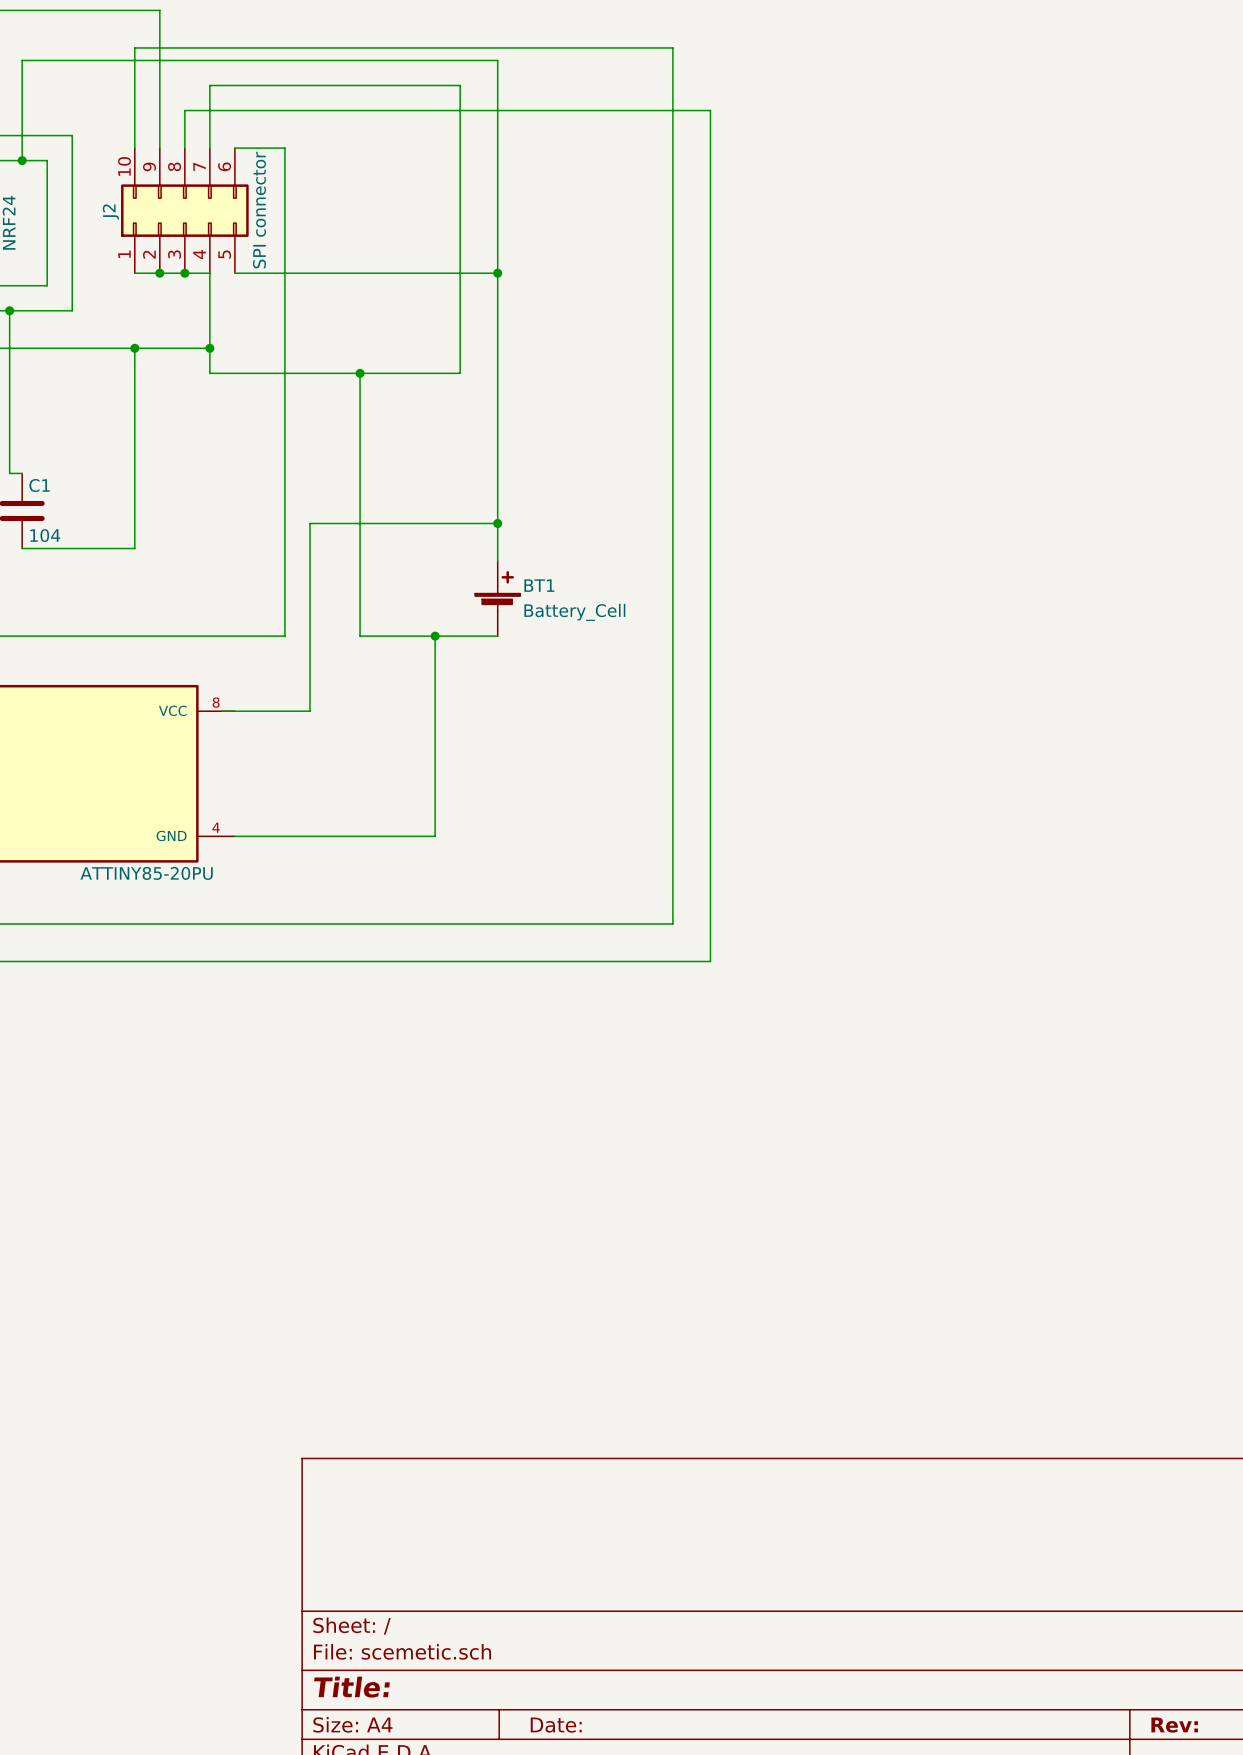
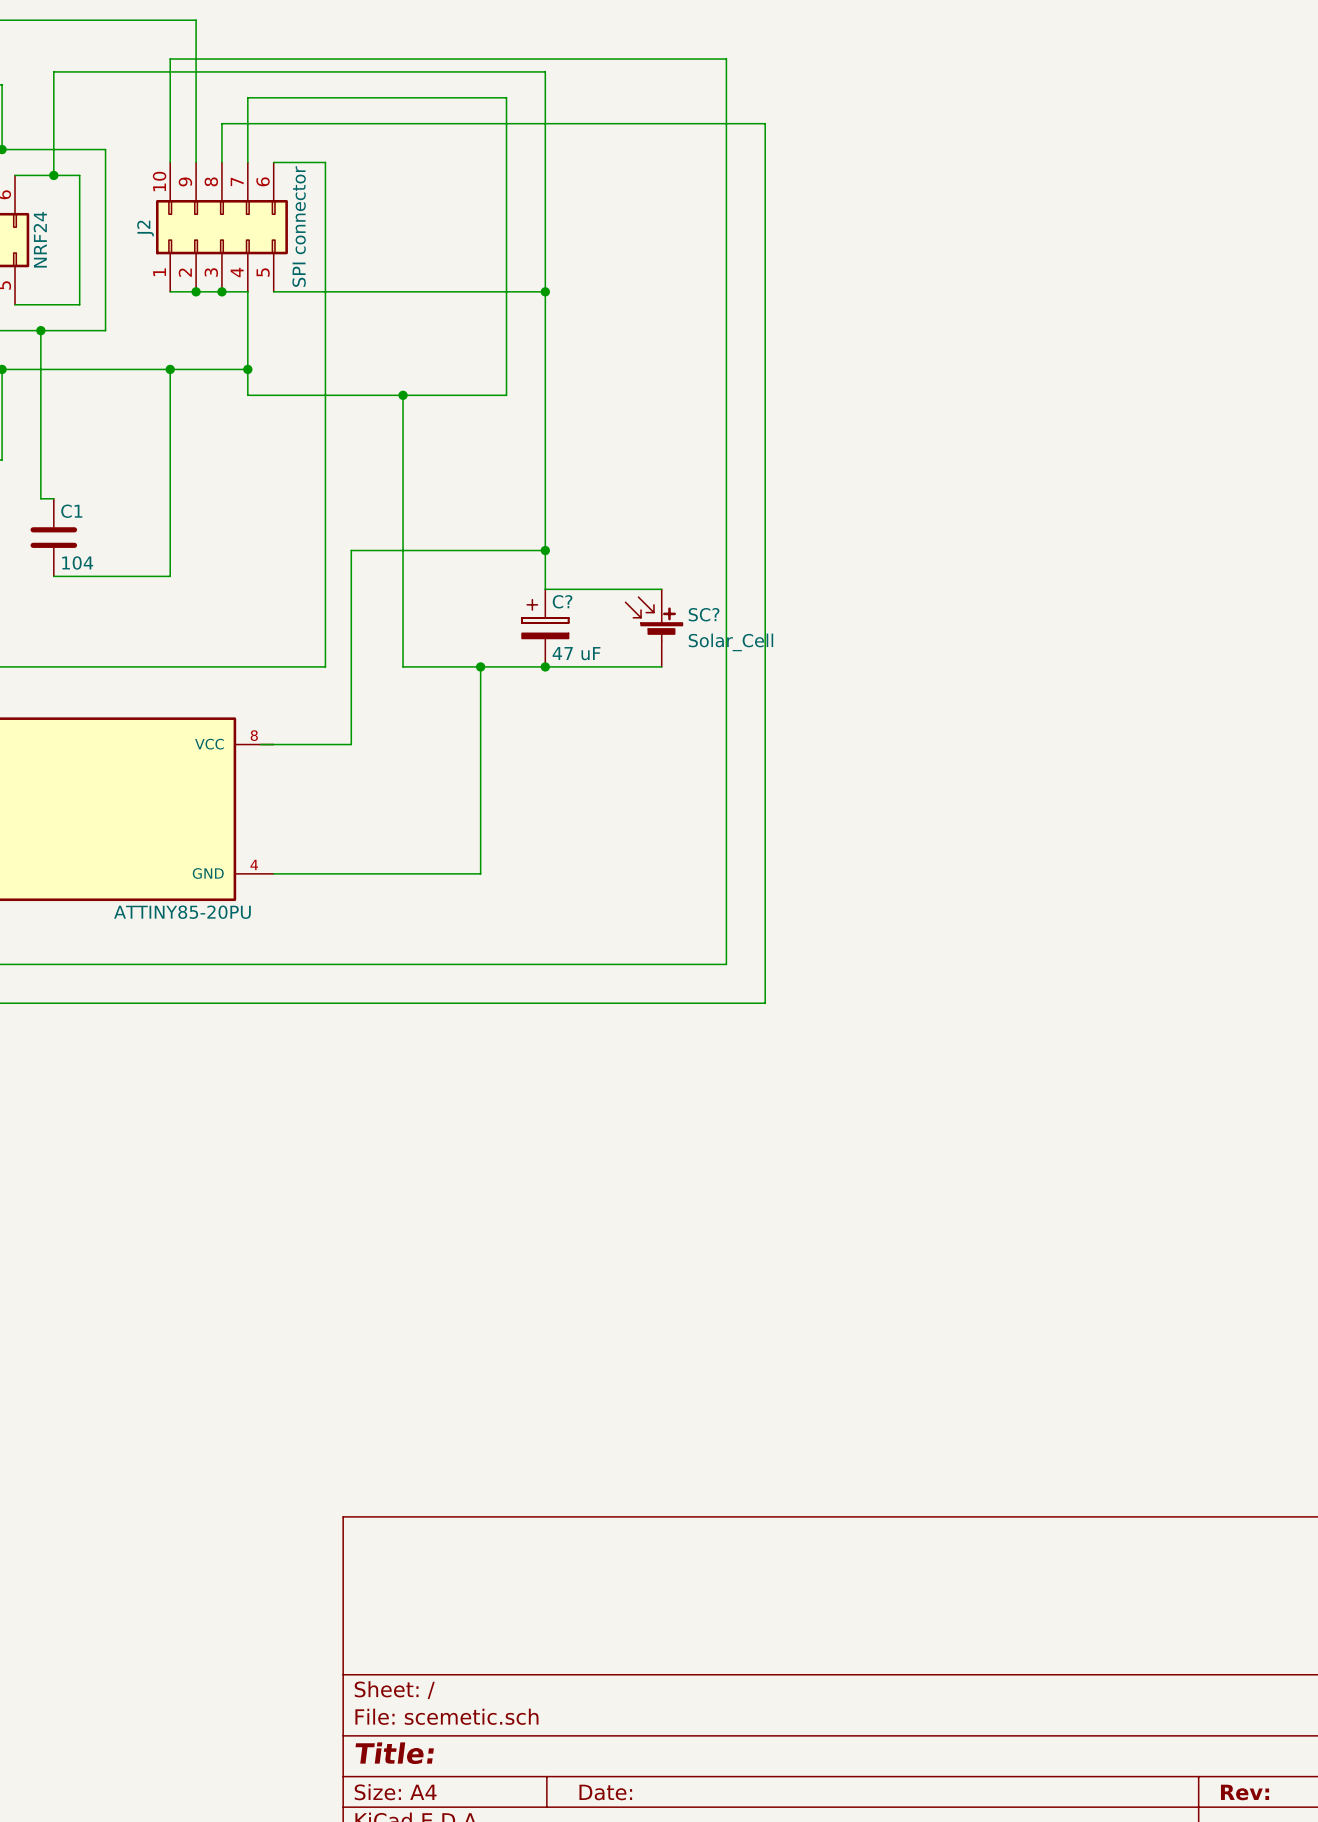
wire: none -> (545, 589) (661, 589)
BT1: Battery_Cell (497, 598) -> none
C?: none -> 47 uF (545, 628)
SC?: none -> Solar_Cell (653, 628)
wire: none -> (545, 666) (661, 666)
junction: none -> (545, 666)

